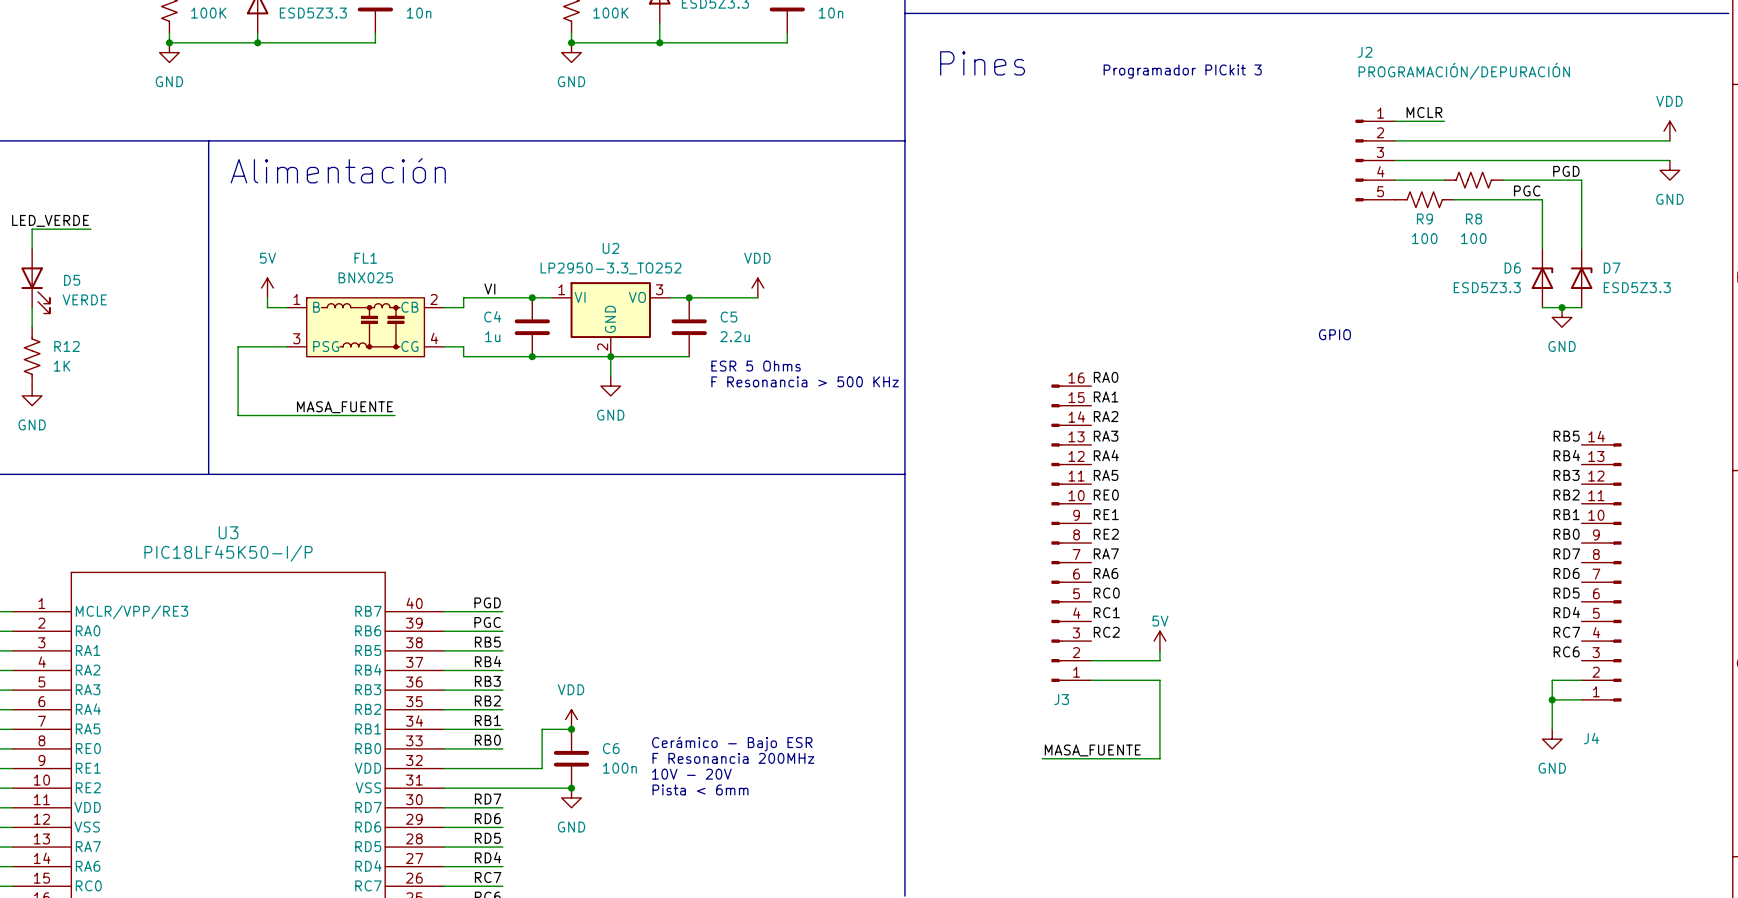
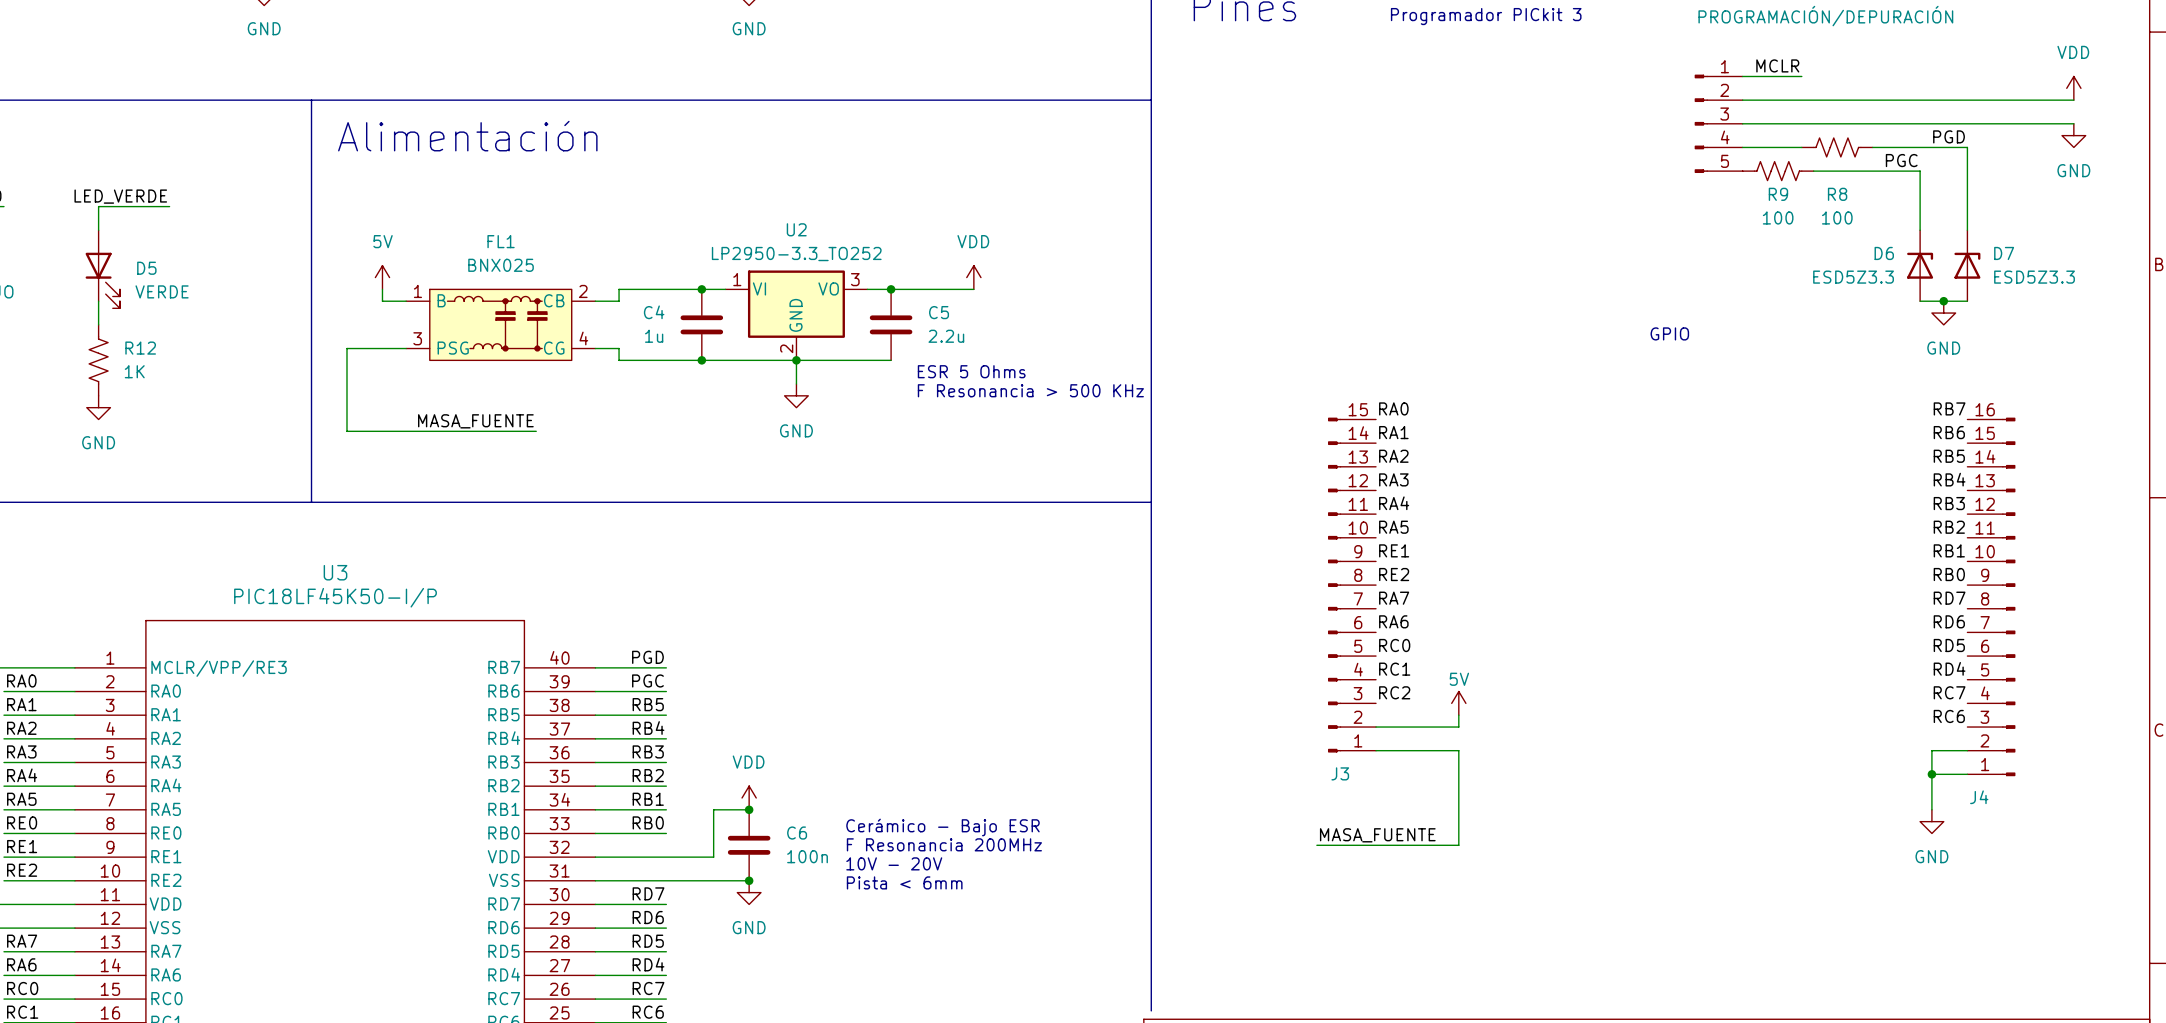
label: VI (489, 289) -> none
label: RA0 (1106, 377) -> none
J3 symbol: [1051, 384, 1092, 682] -> [1327, 417, 1377, 753]
label: RA1 (1106, 396) -> RA0 (1393, 408)
label: none -> RB7 (1949, 408)
label: RA2 (1106, 416) -> RA1 (1393, 432)
label: none -> RB6 (1949, 432)
label: RA3 (1106, 436) -> RA2 (1393, 456)
J4 symbol: [1581, 443, 1622, 702] -> [1967, 417, 2016, 777]
label: RA4 (1106, 455) -> RA3 (1393, 479)
label: RA5 (1106, 475) -> RA4 (1394, 503)
label: RE0 (1106, 495) -> RA5 (1393, 527)

